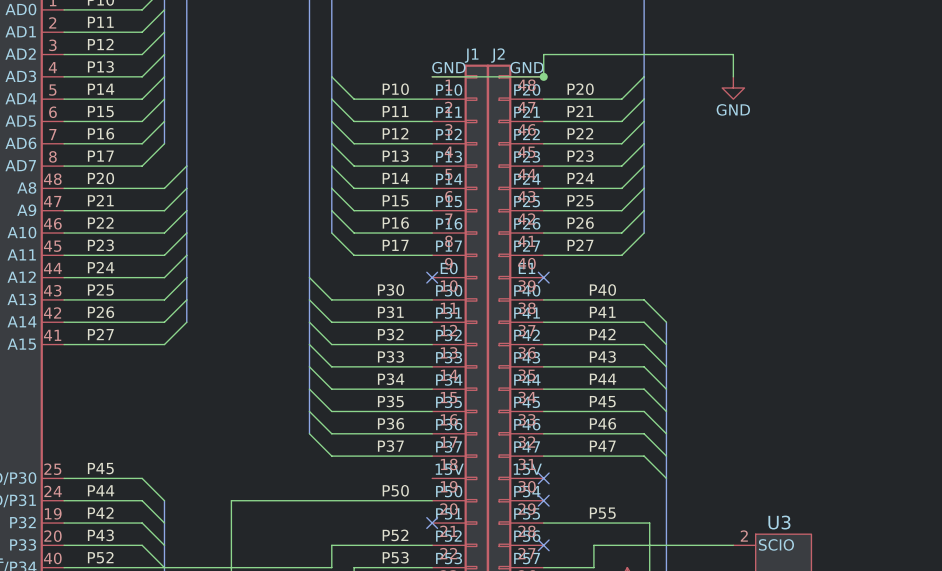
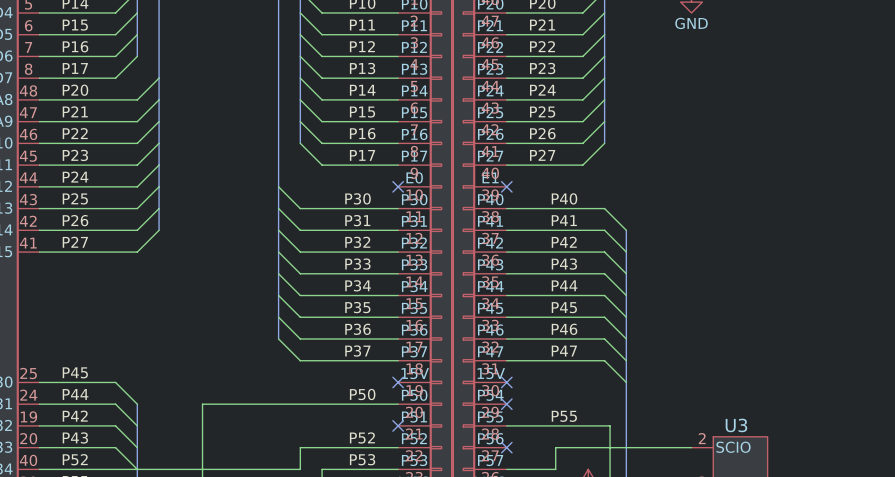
no-connect mark: none -> (398, 382)

